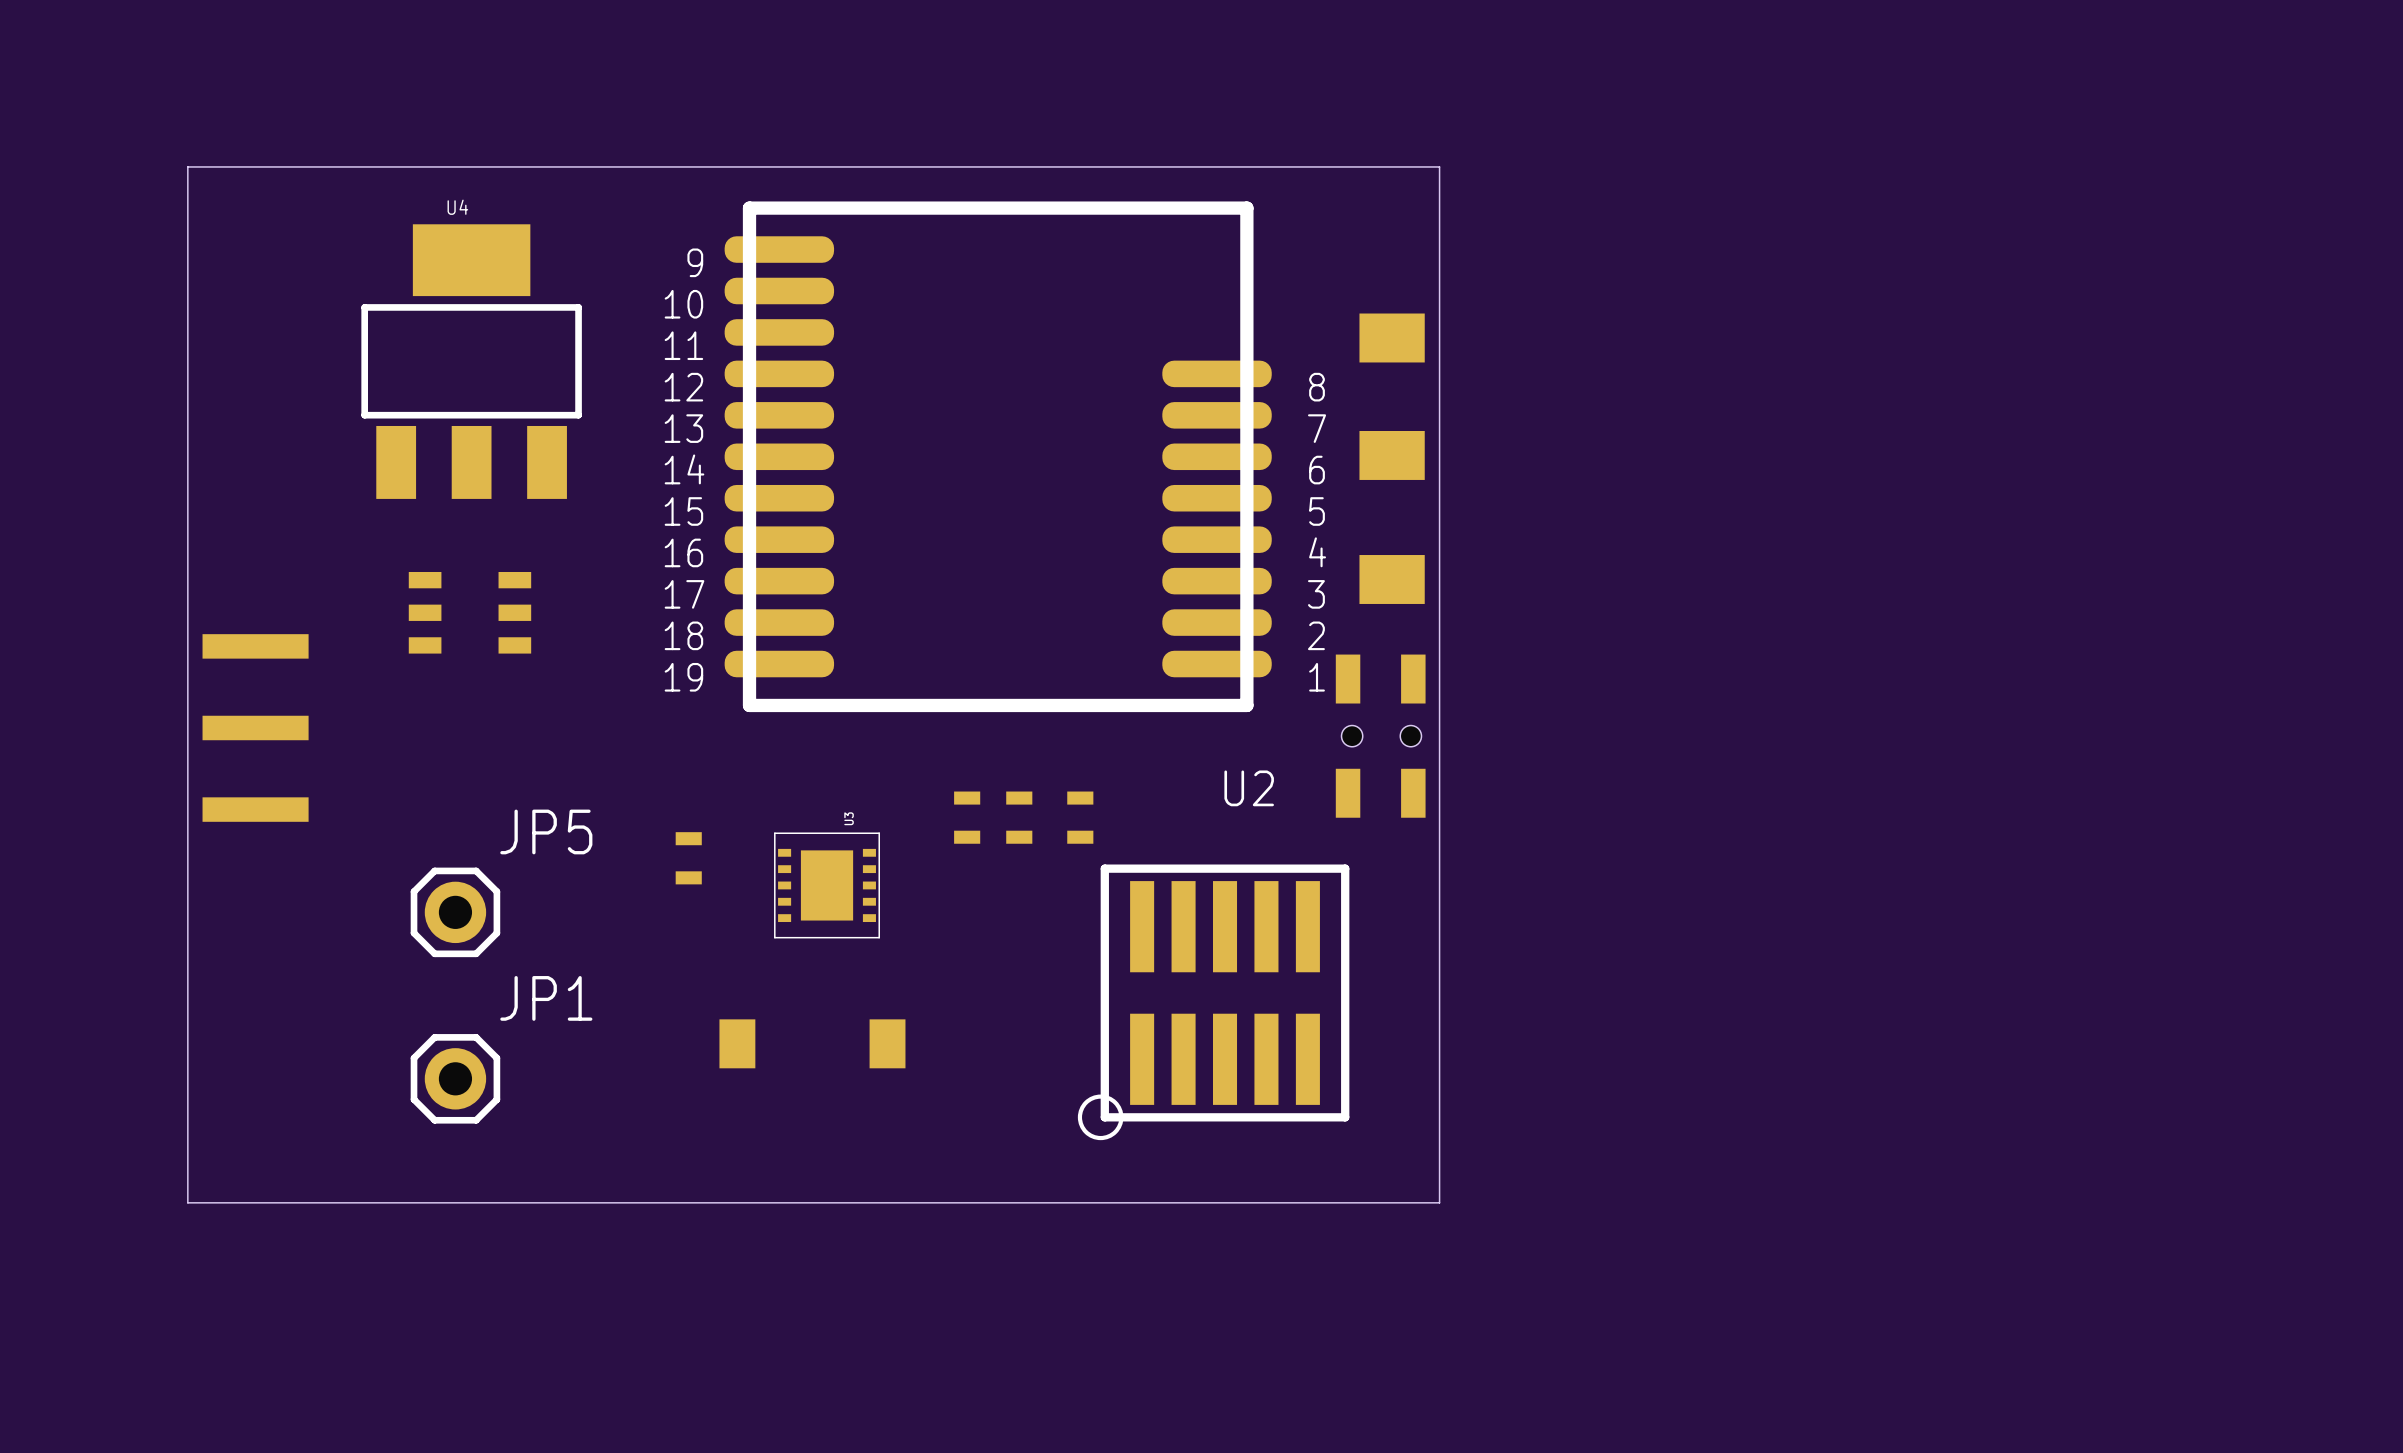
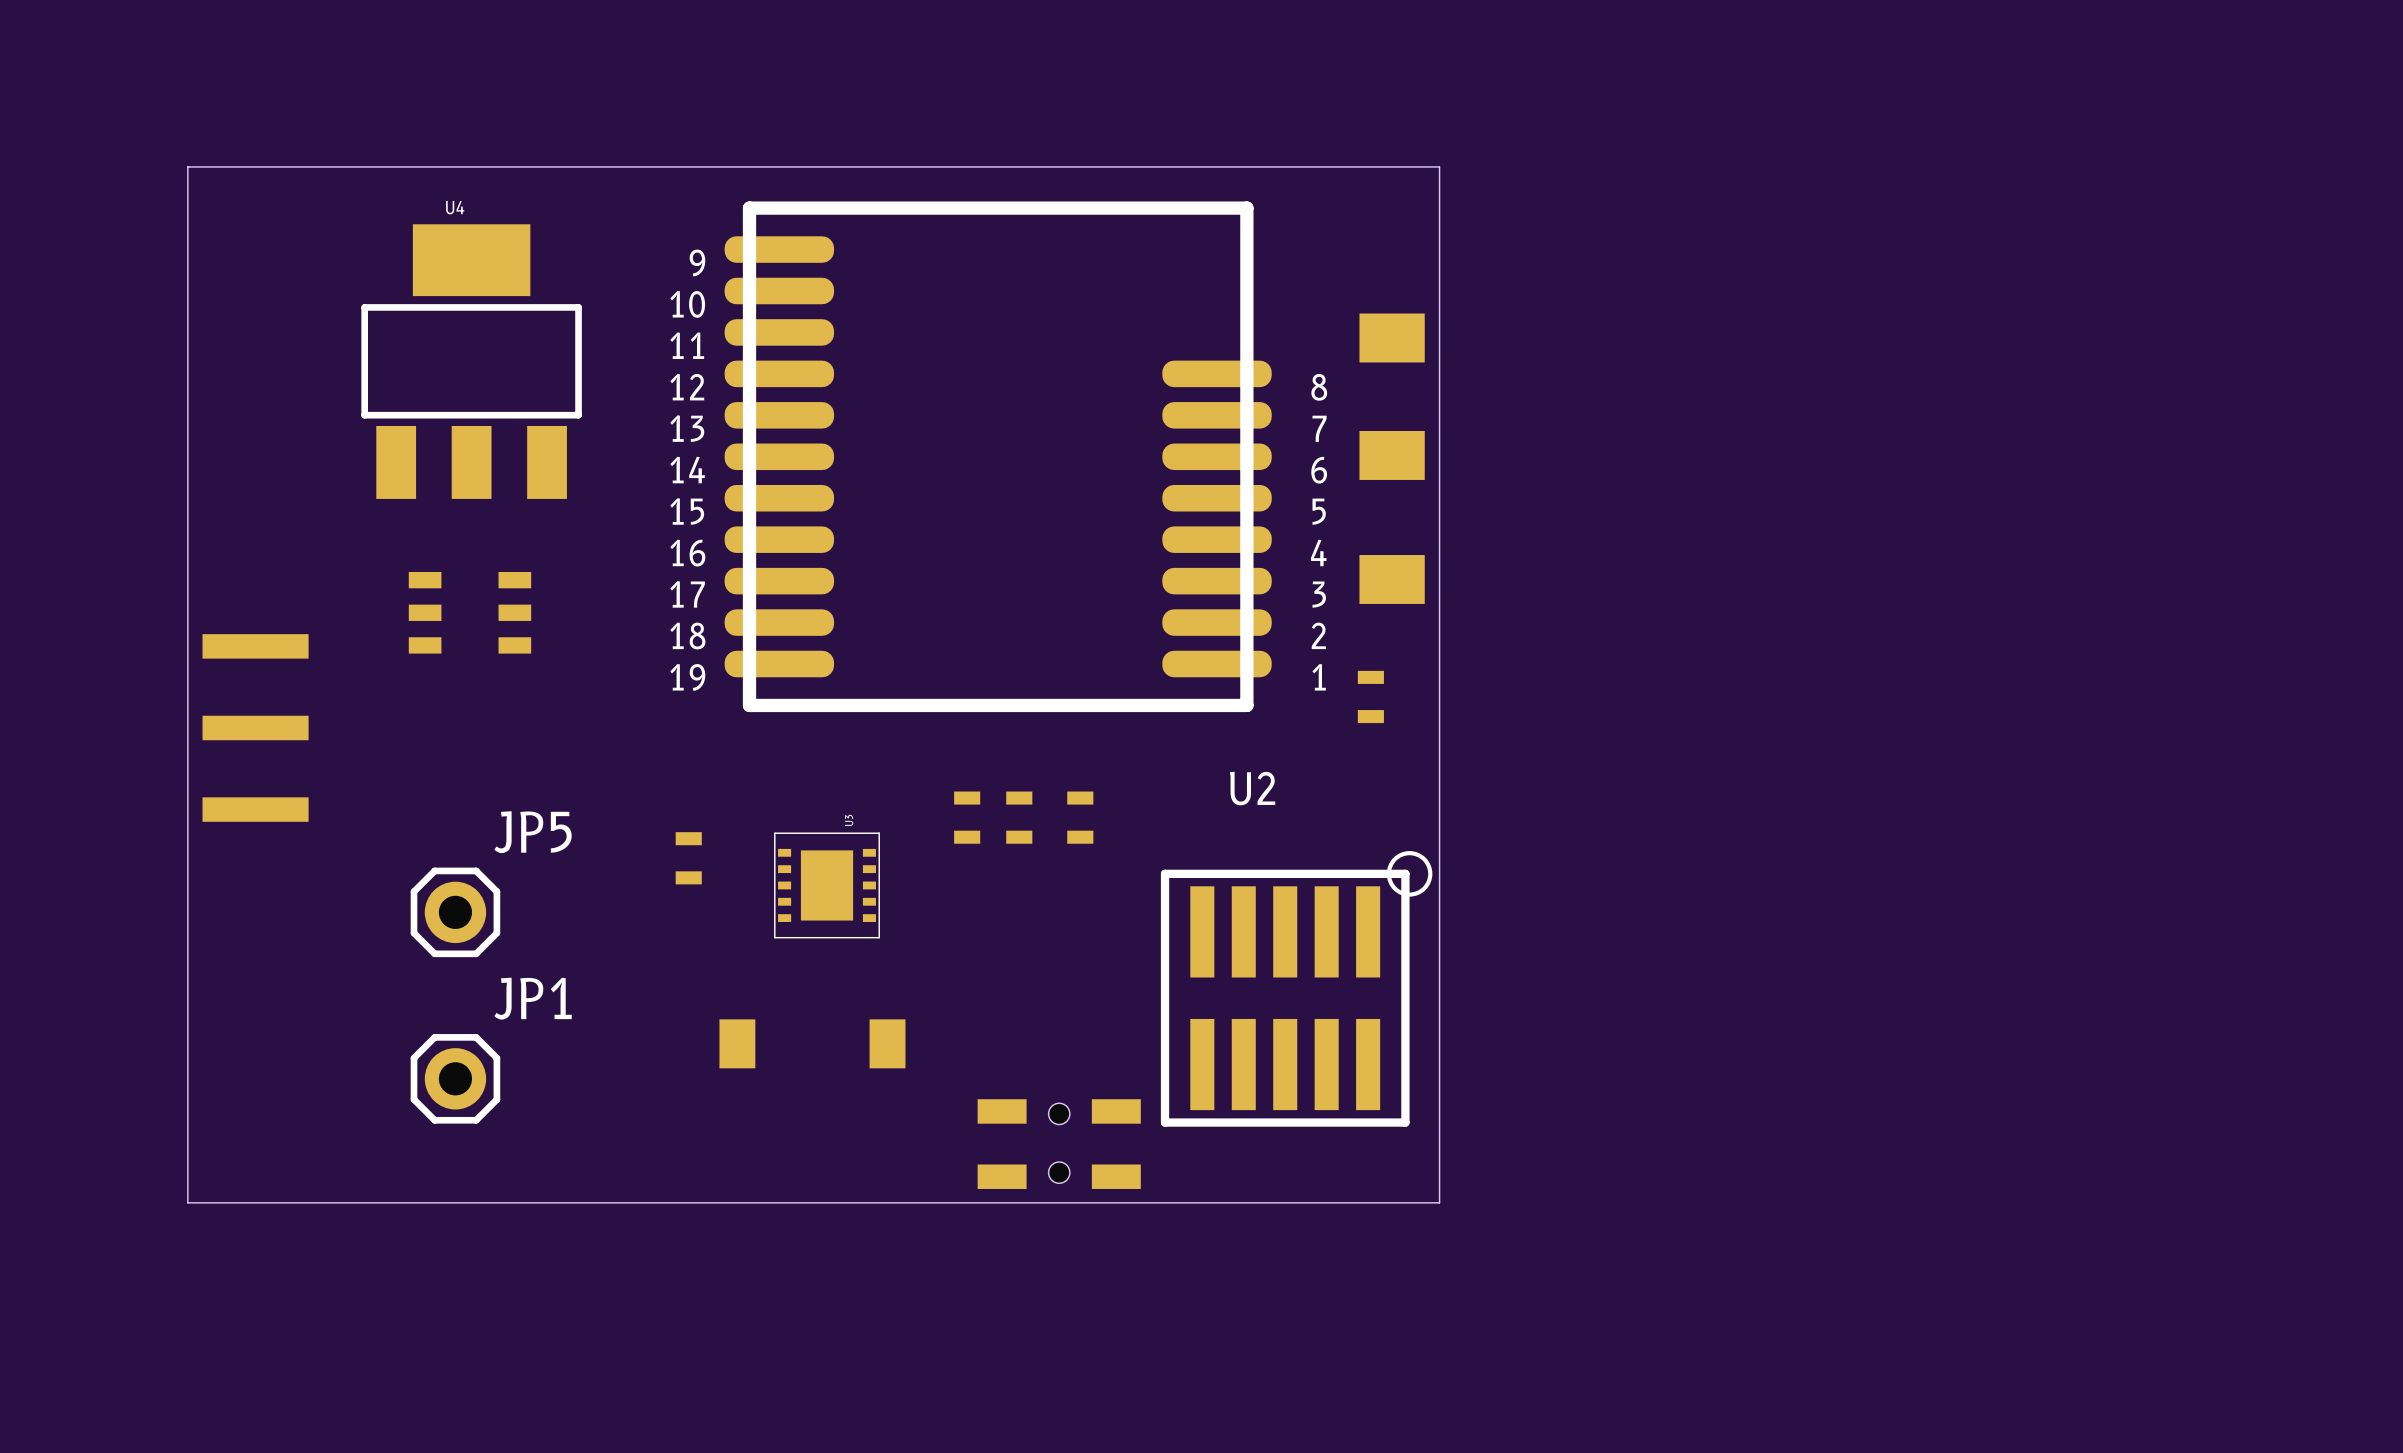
part: none -> (1370, 696)
part rotation: 0° (1380, 736) -> 90° counterclockwise (1059, 1144)
part position: (1380, 736) -> (1059, 1144)
part rotation: 0° (1213, 1002) -> 180° (1296, 988)

